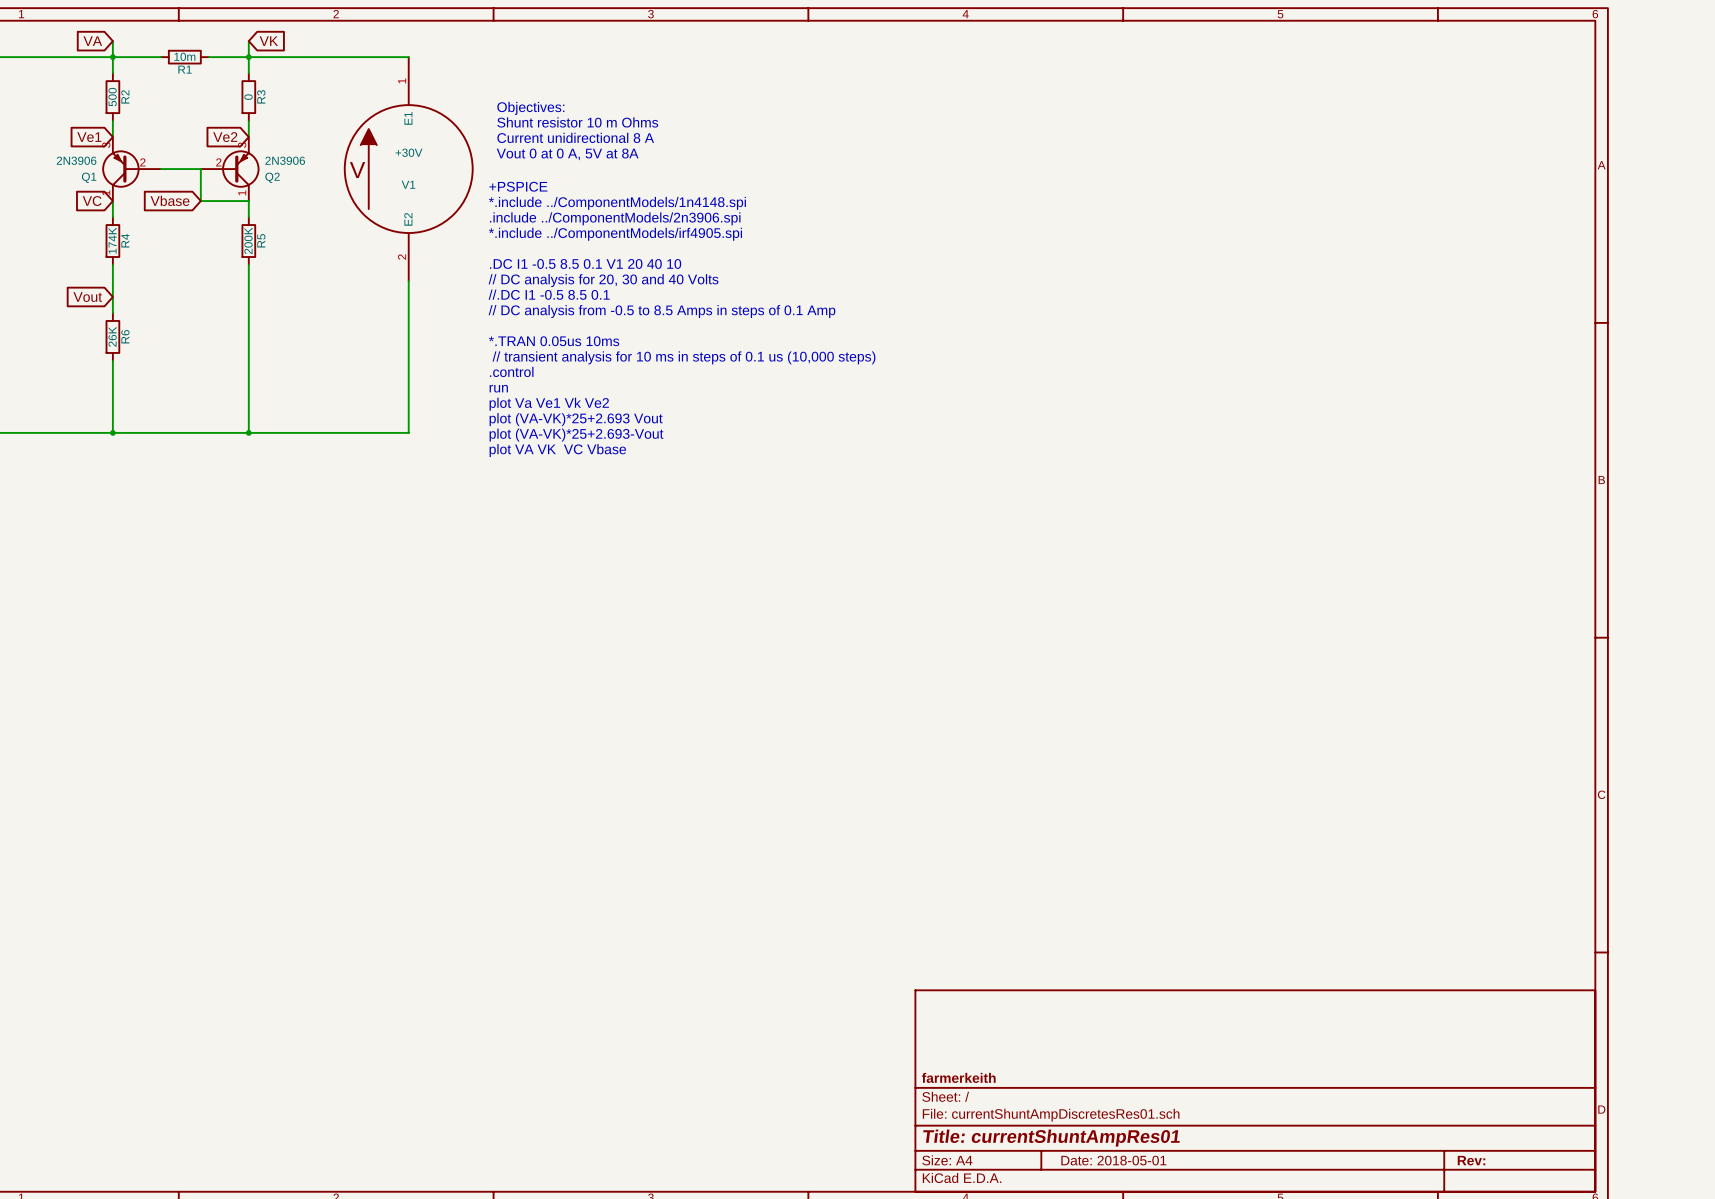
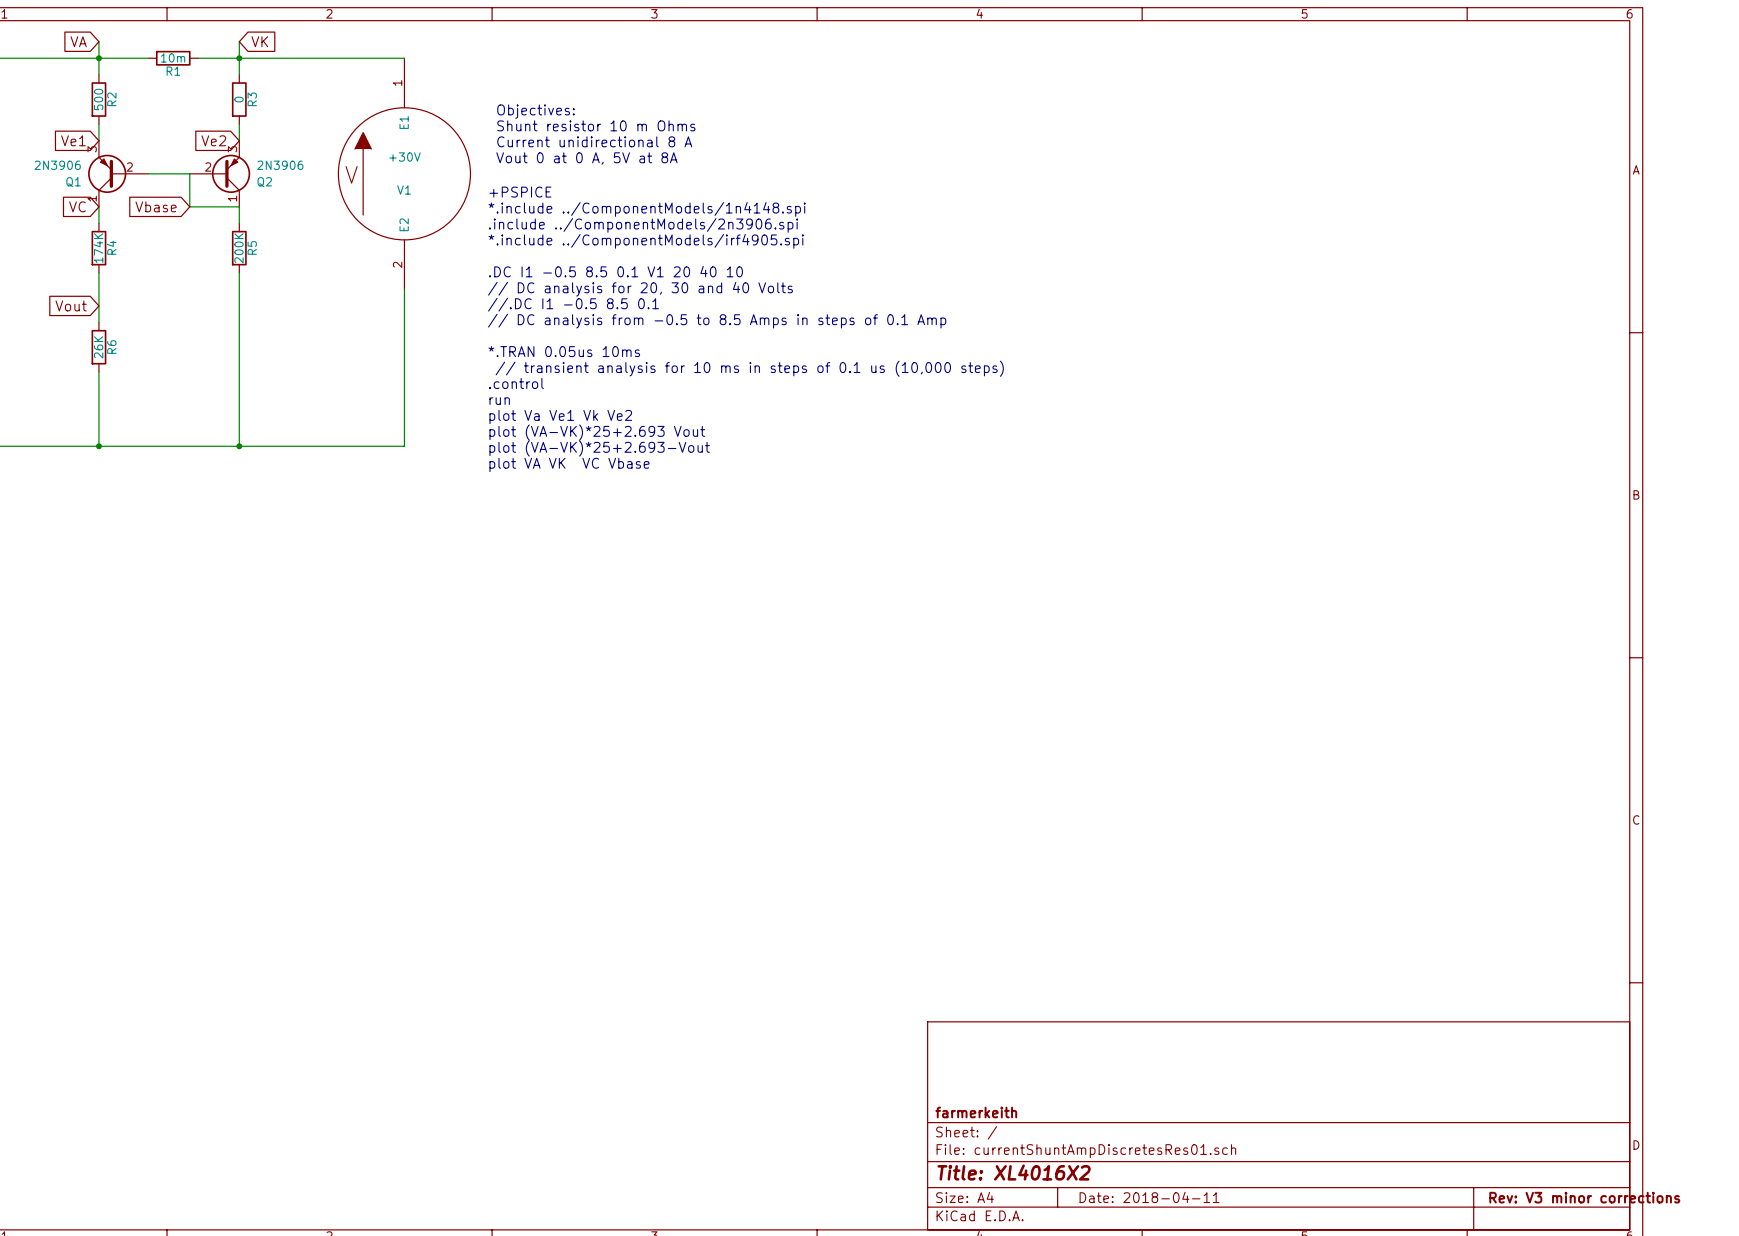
title block: Title: currentShuntAmpRes01 (1051, 1138) -> Title: XL4016X2 (1014, 1172)
title block: Date: 2018-05-01 (1113, 1160) -> Date: 2018-04-11 (1149, 1197)
title block: Rev: (1471, 1160) -> Rev: V3 minor corrections (1584, 1197)

